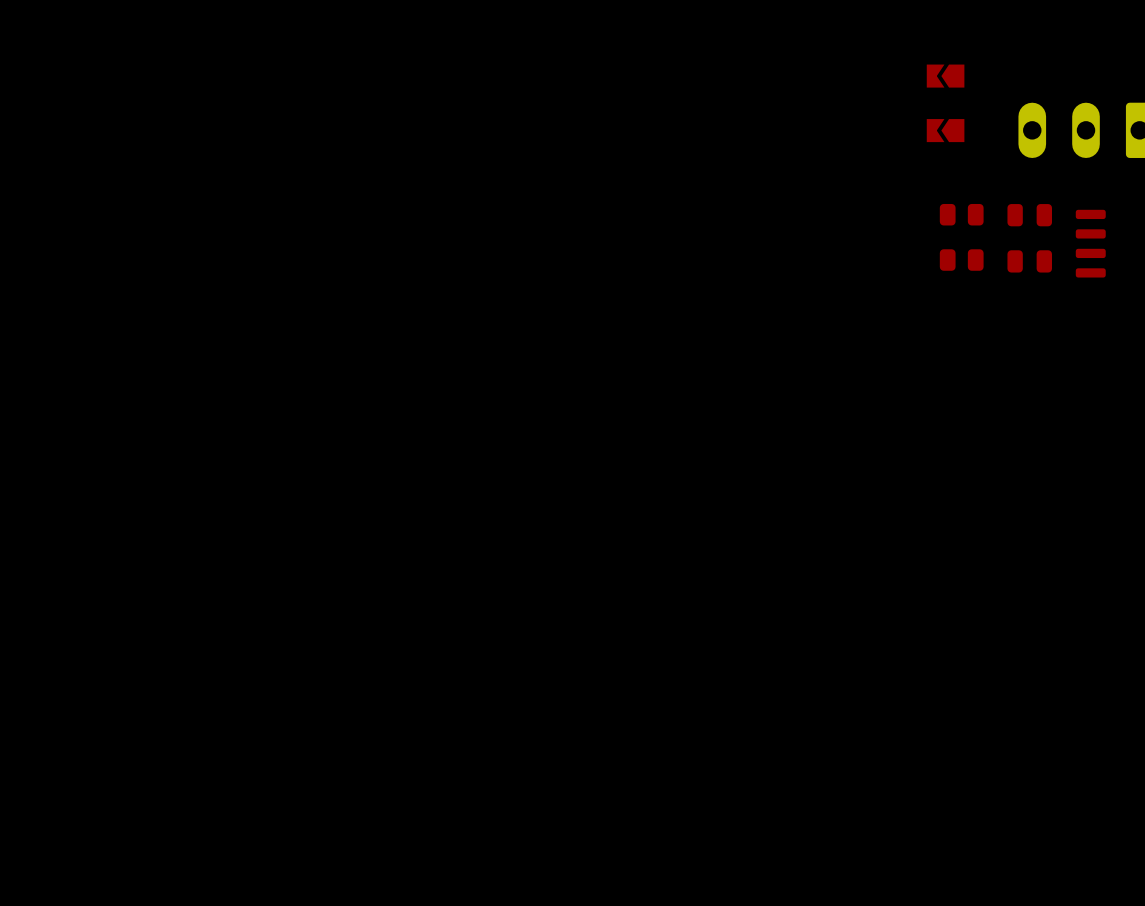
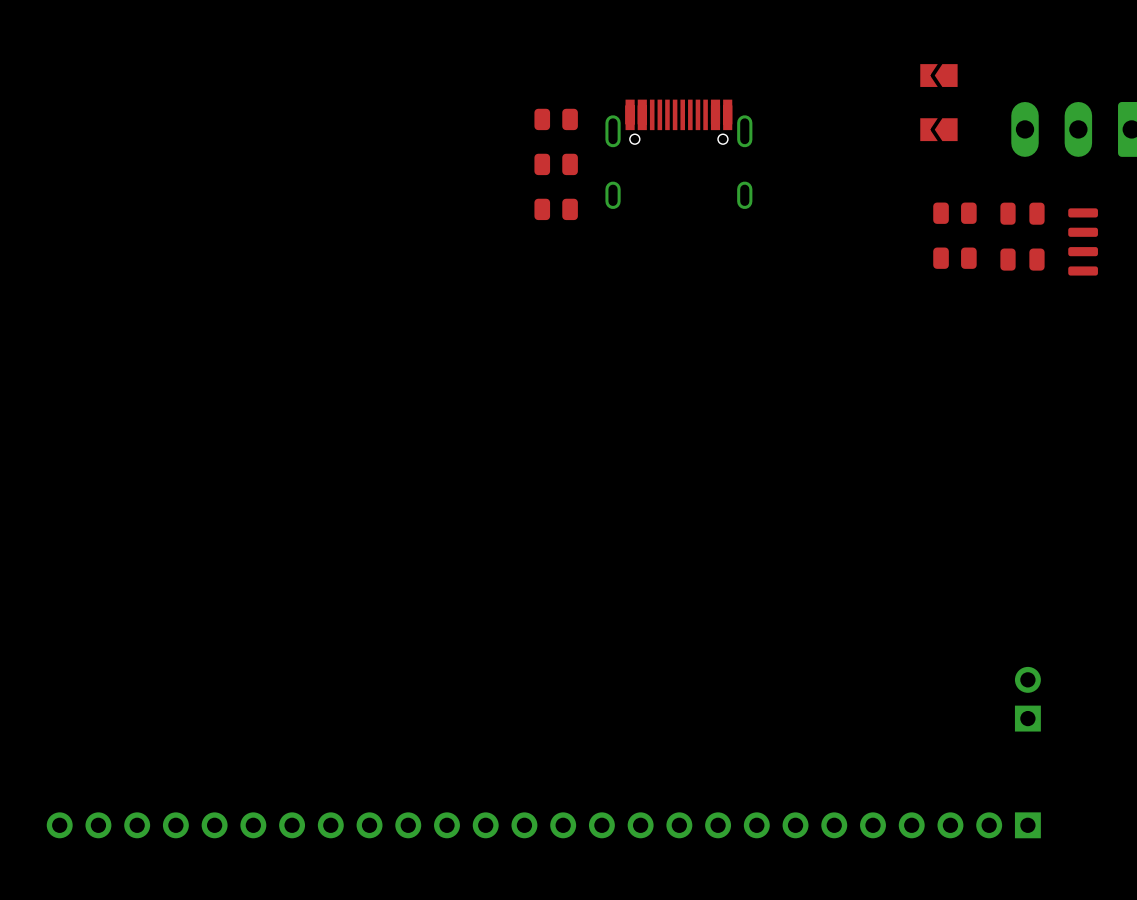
part: none -> (556, 119)
part: none -> (678, 154)
part: none -> (556, 164)
part: none -> (556, 209)
part: none -> (1027, 699)
part: none -> (543, 825)

